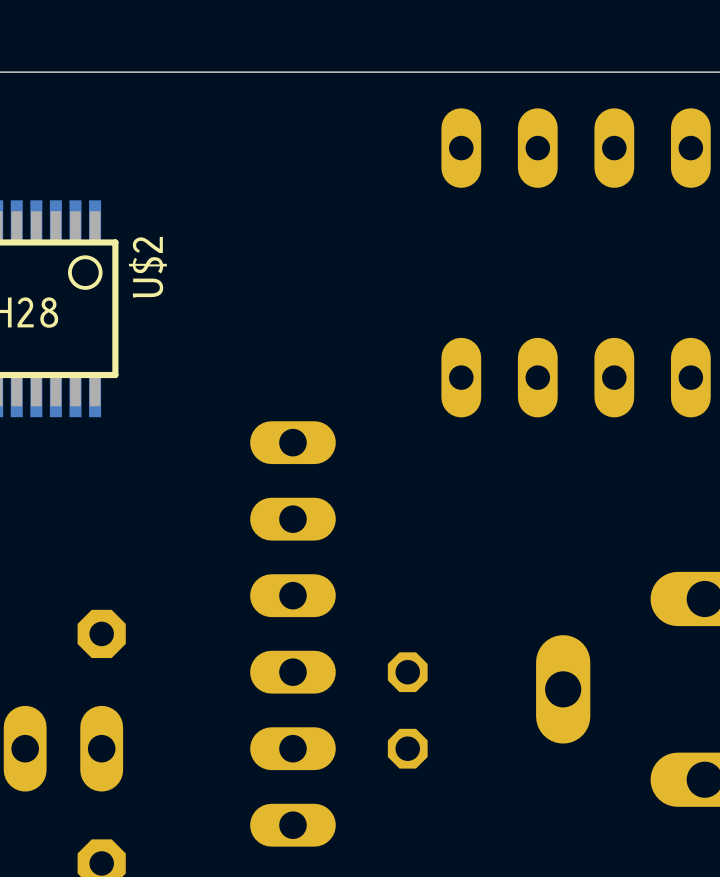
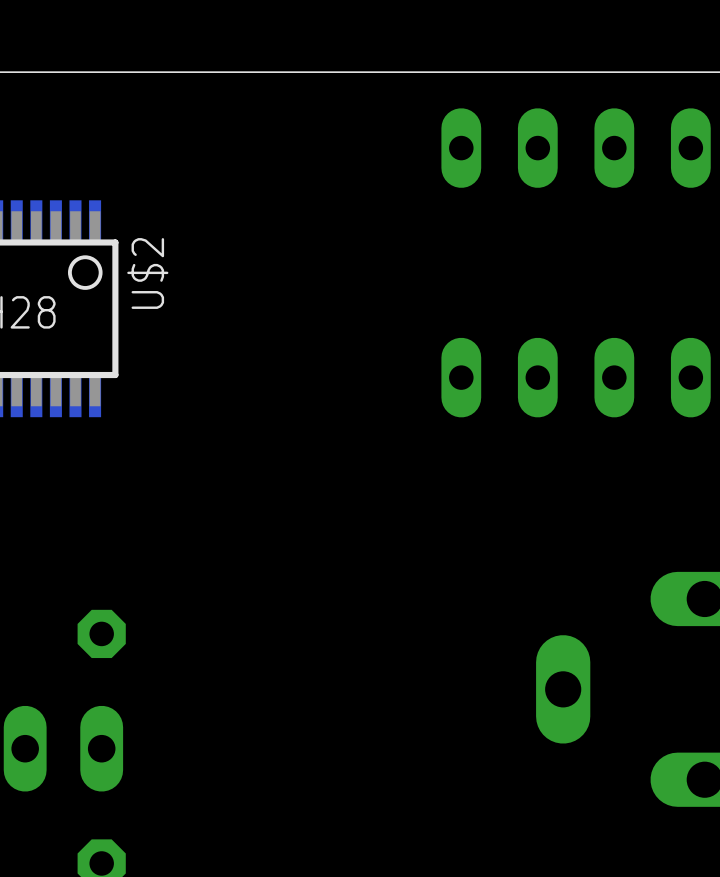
part: (292, 519) -> none
part: (407, 710) -> none
part: (292, 748) -> none

